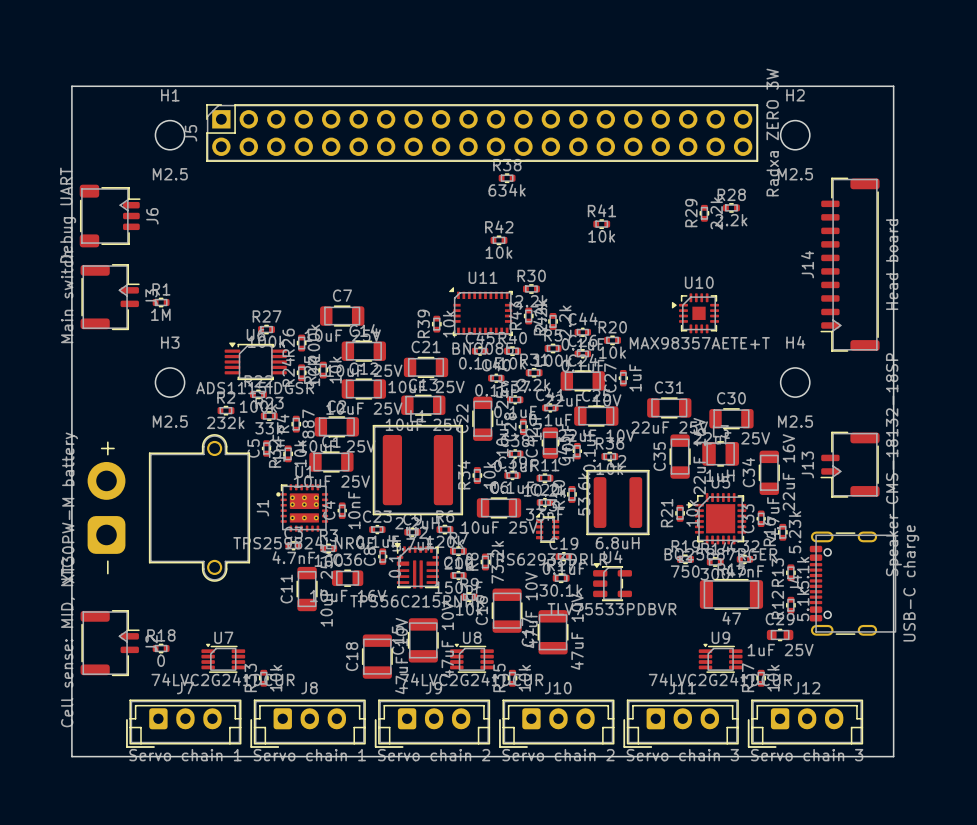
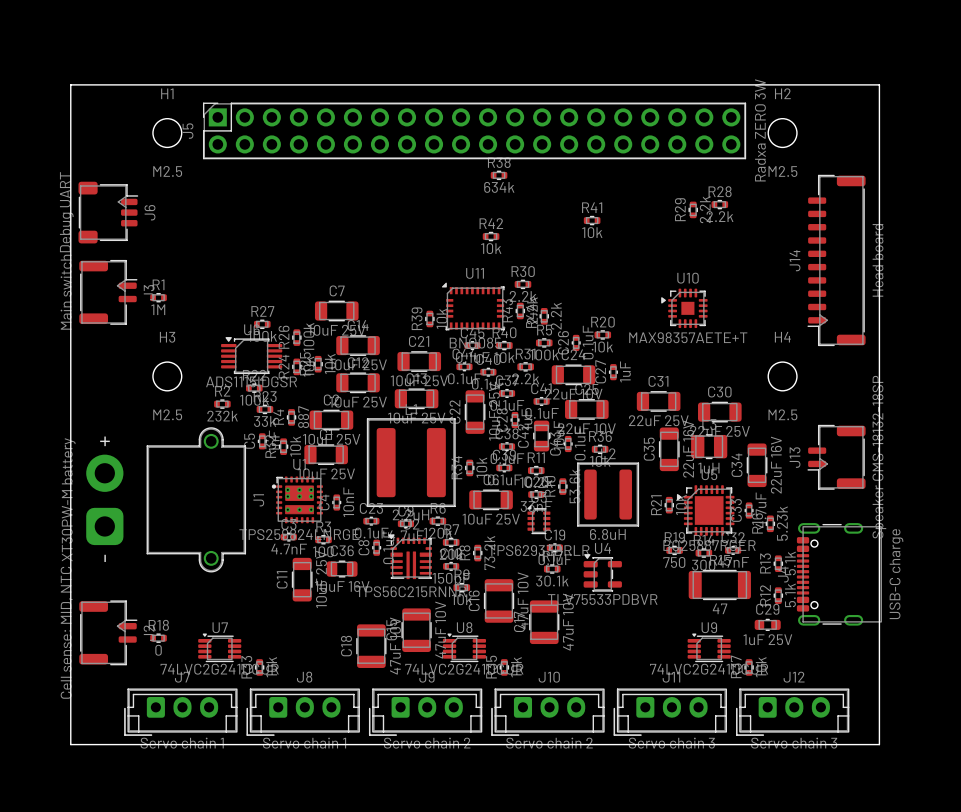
C44 position: (582, 332) -> (464, 366)
C26 rotation: 0° (582, 353) -> 90° clockwise (576, 342)

